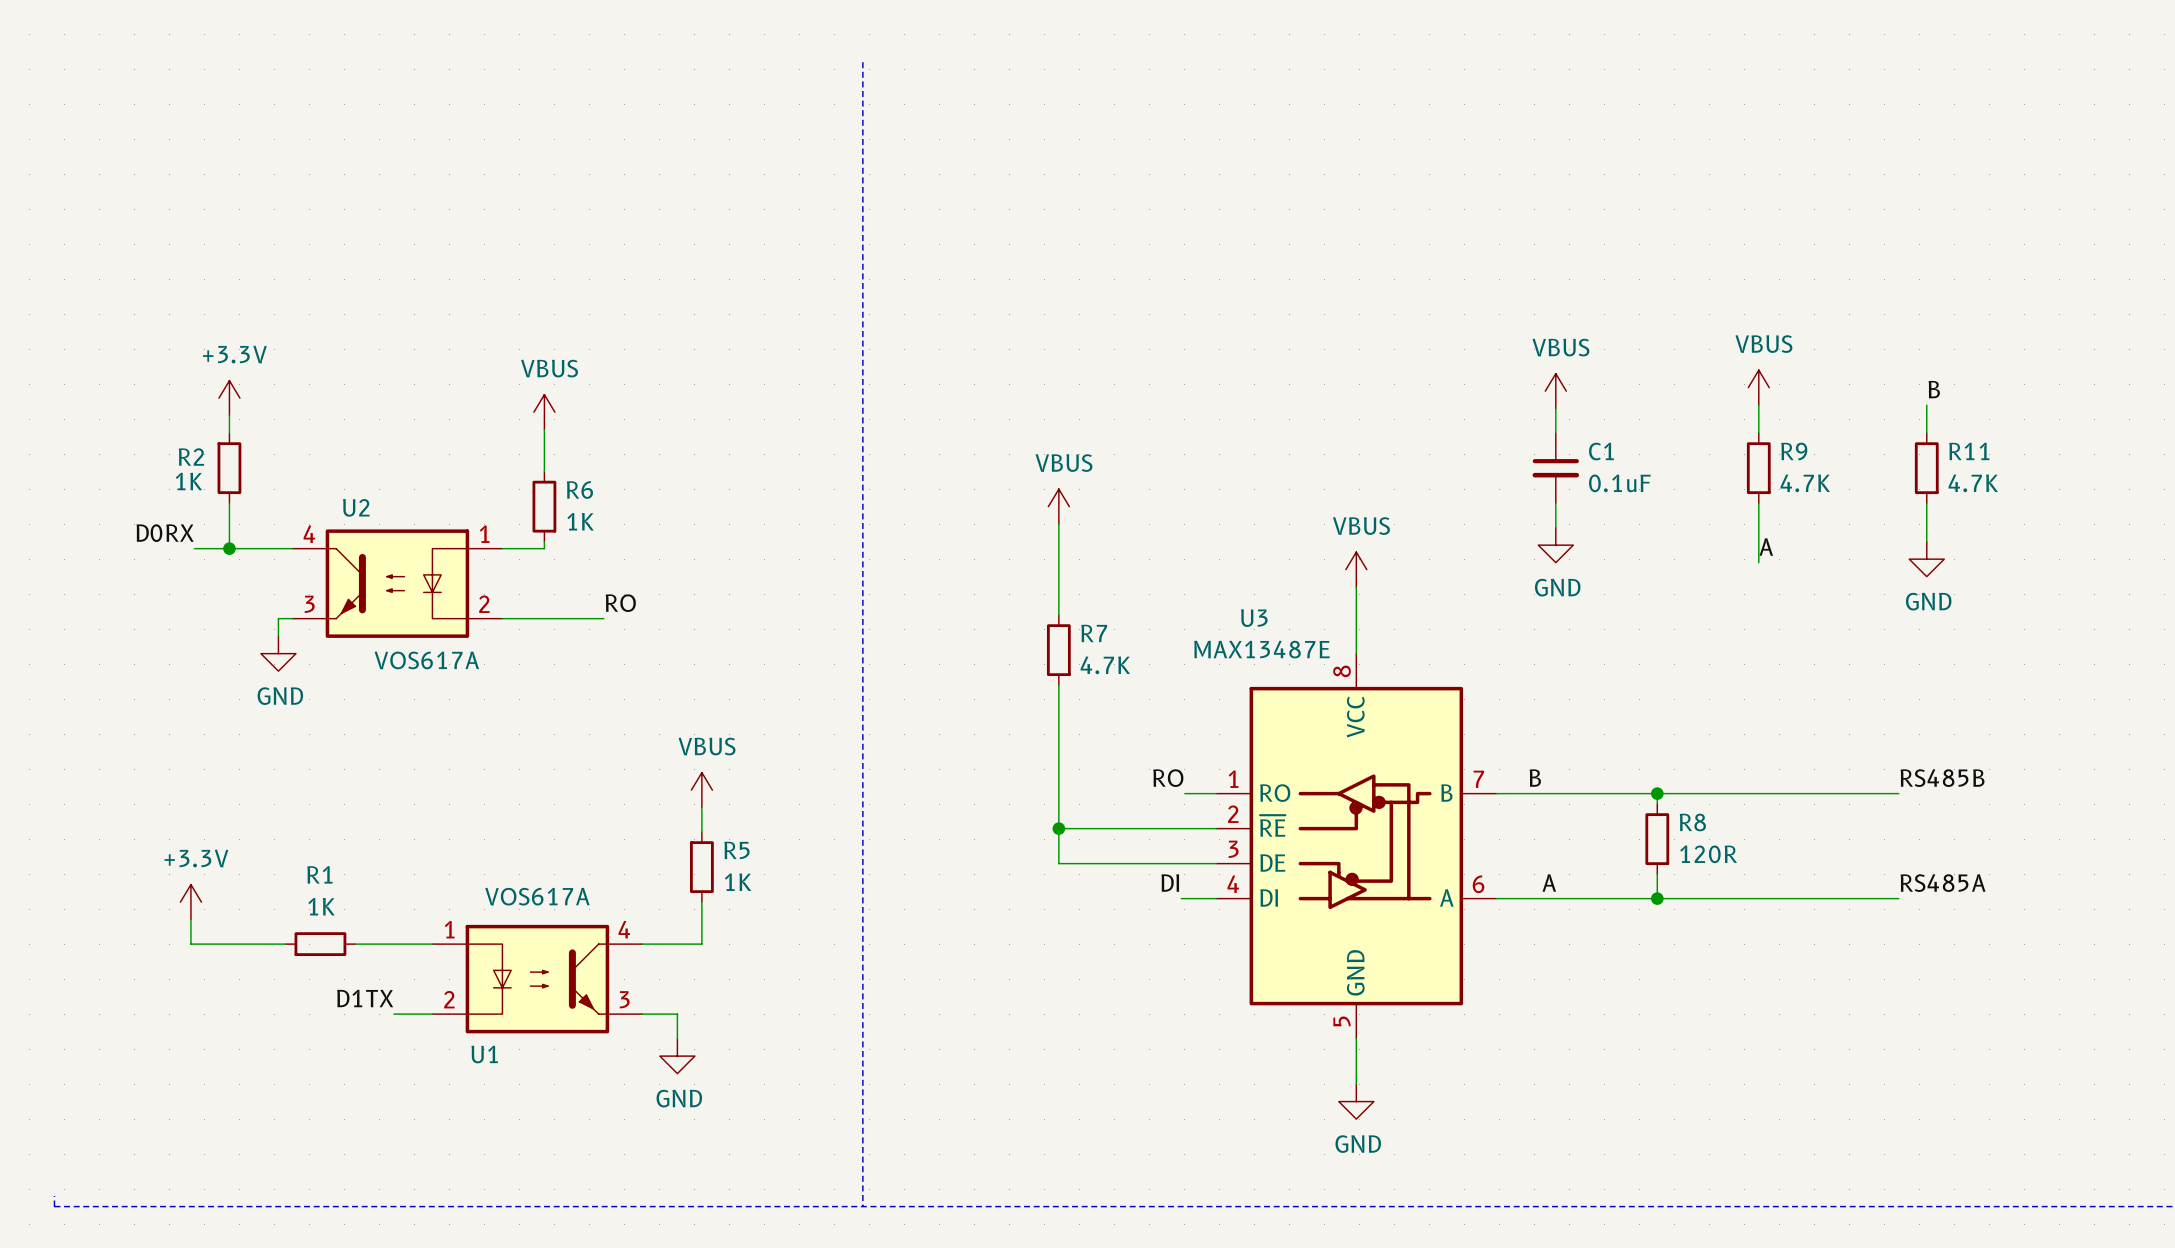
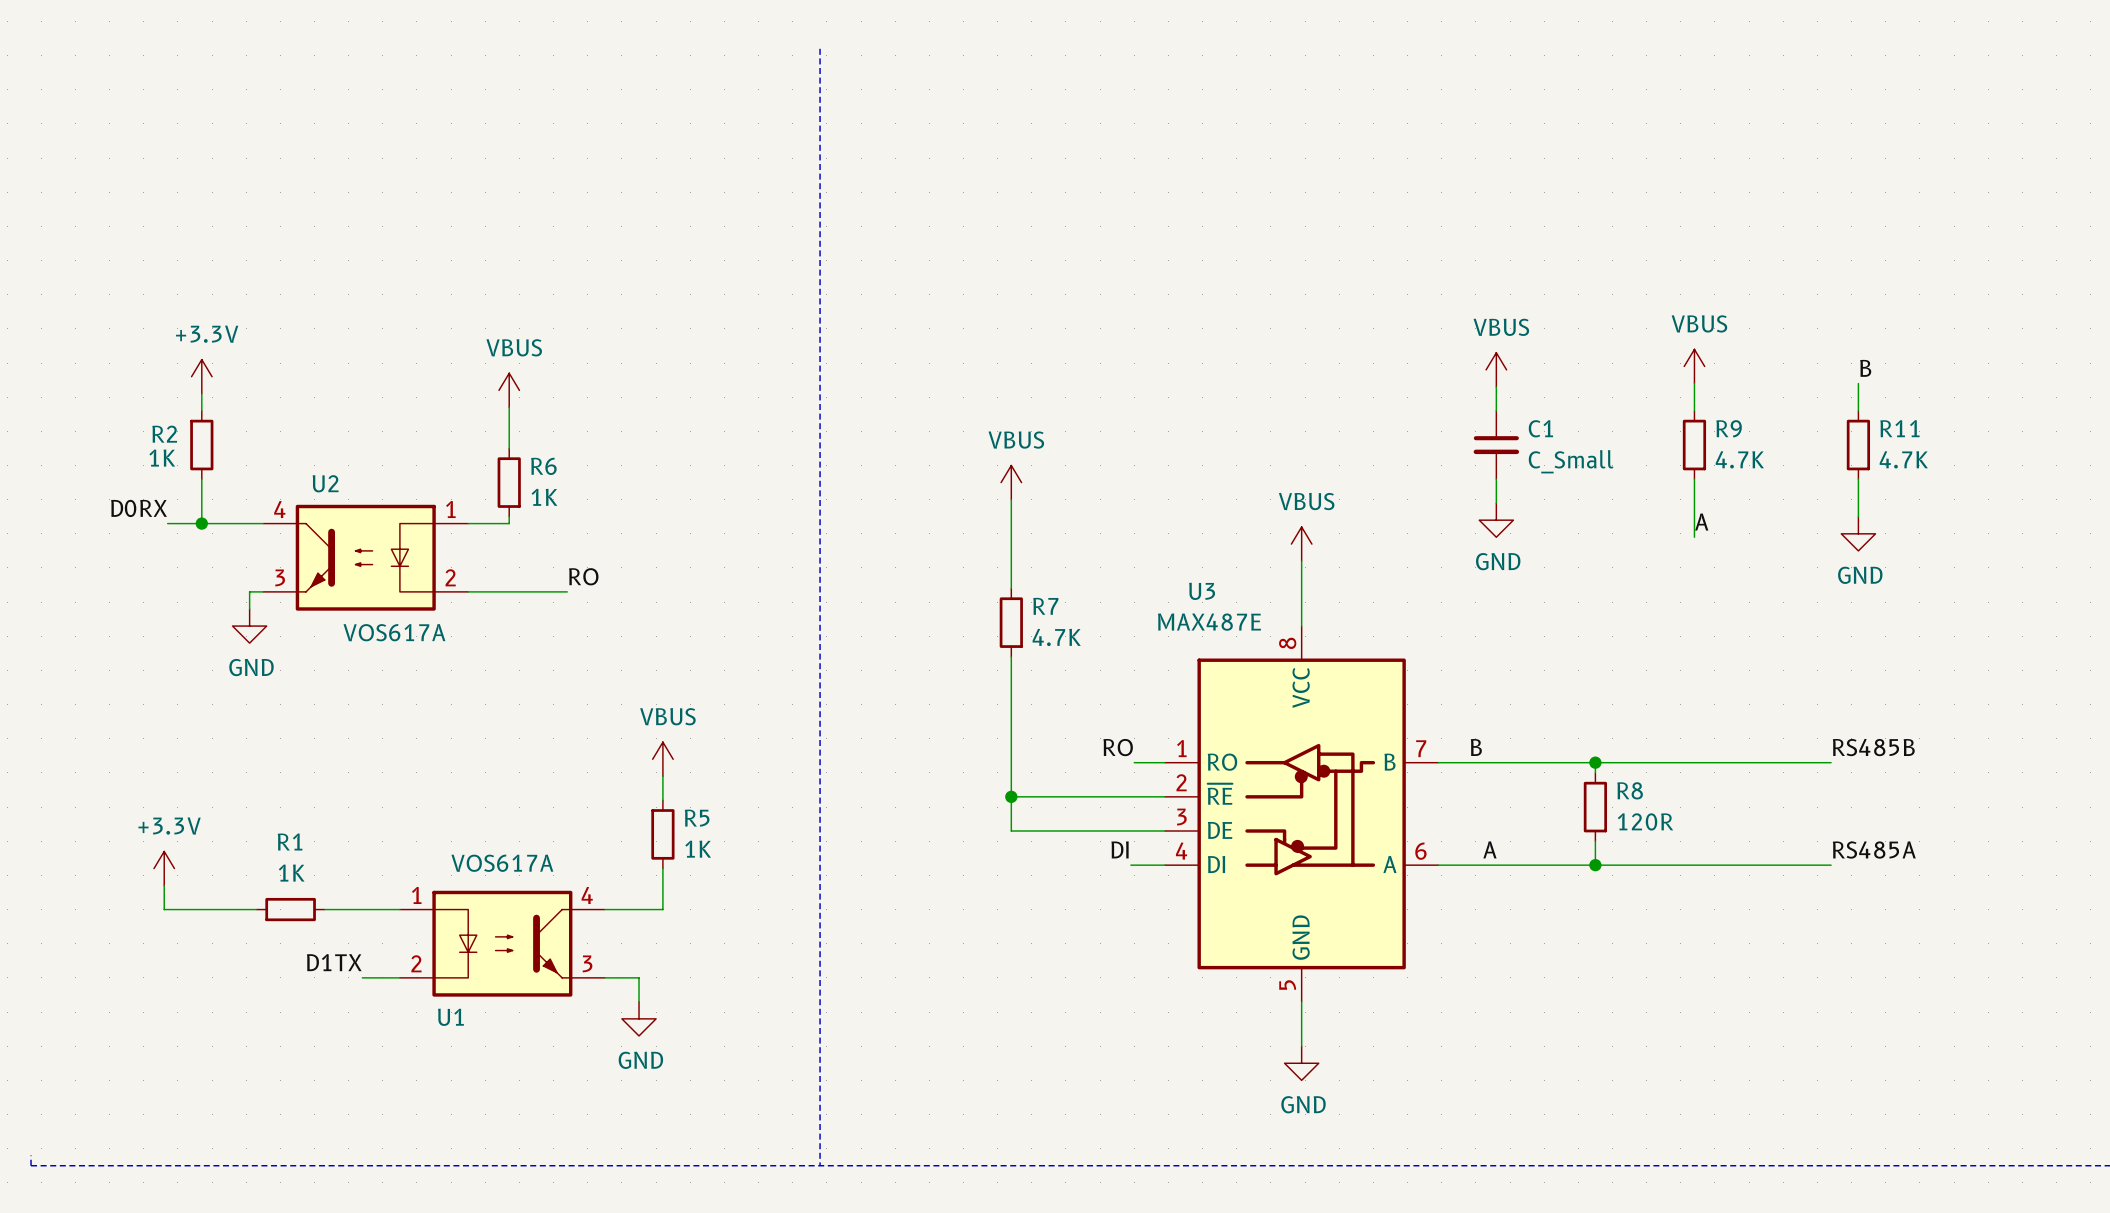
C1 value: 0.1uF (1619, 483) -> C_Small (1571, 461)
U3 value: MAX13487E (1261, 649) -> MAX487E (1209, 622)

